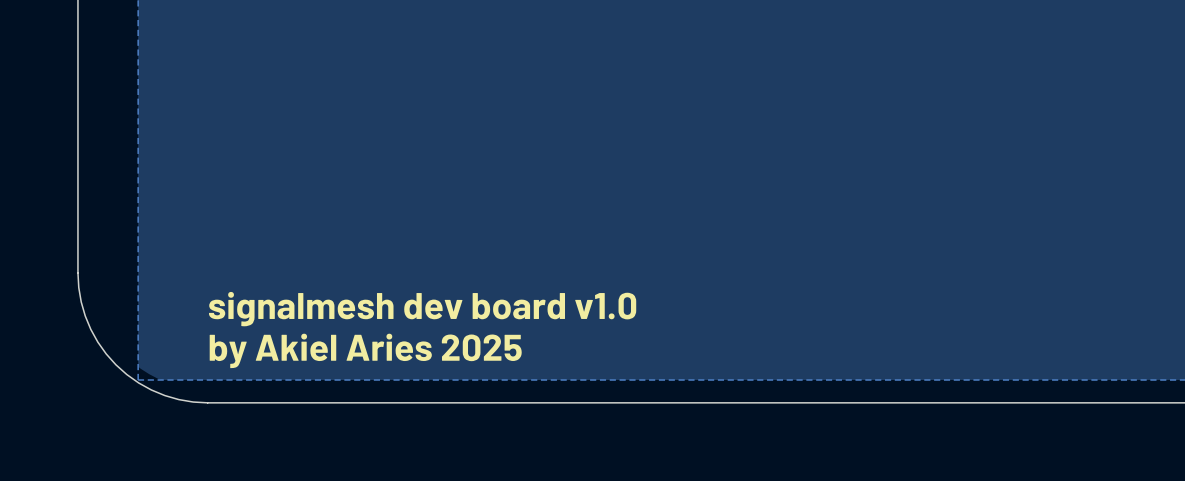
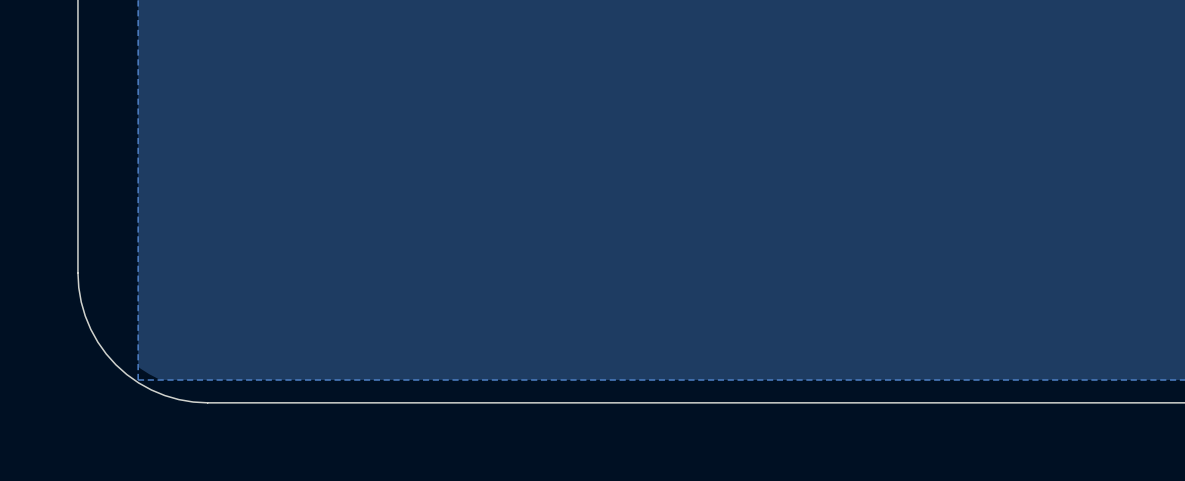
text: signalmesh dev board v1.0 (422, 309) -> none
text: by Akiel Aries 2025 (365, 350) -> none

